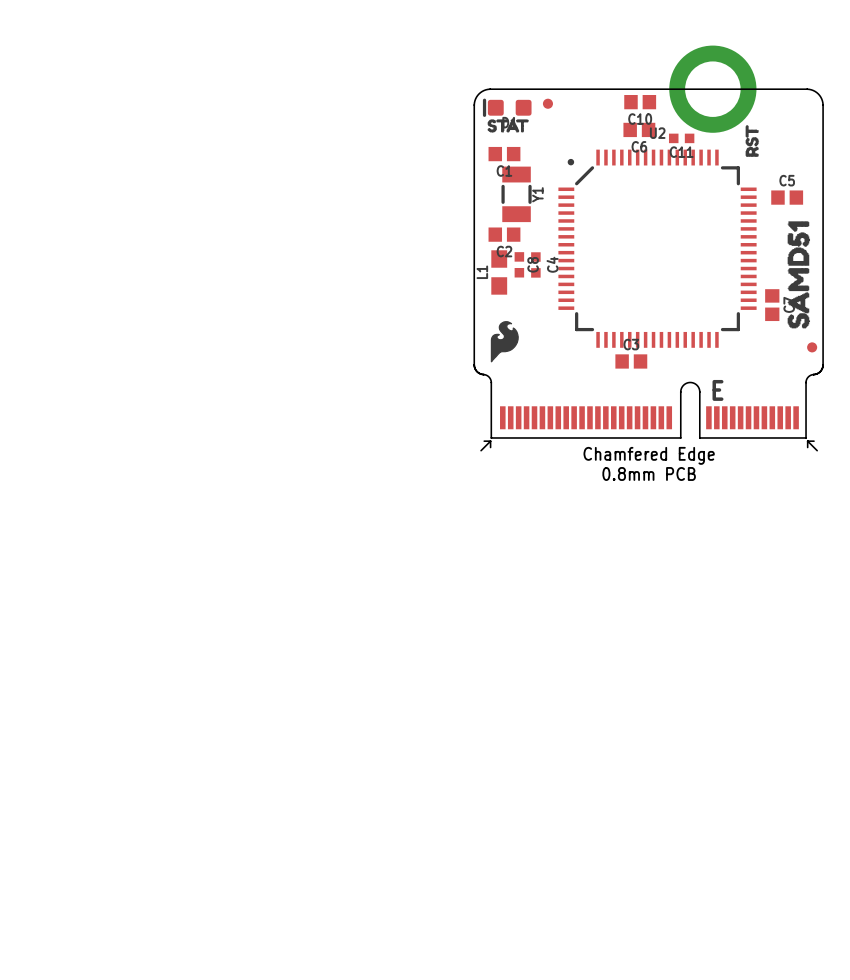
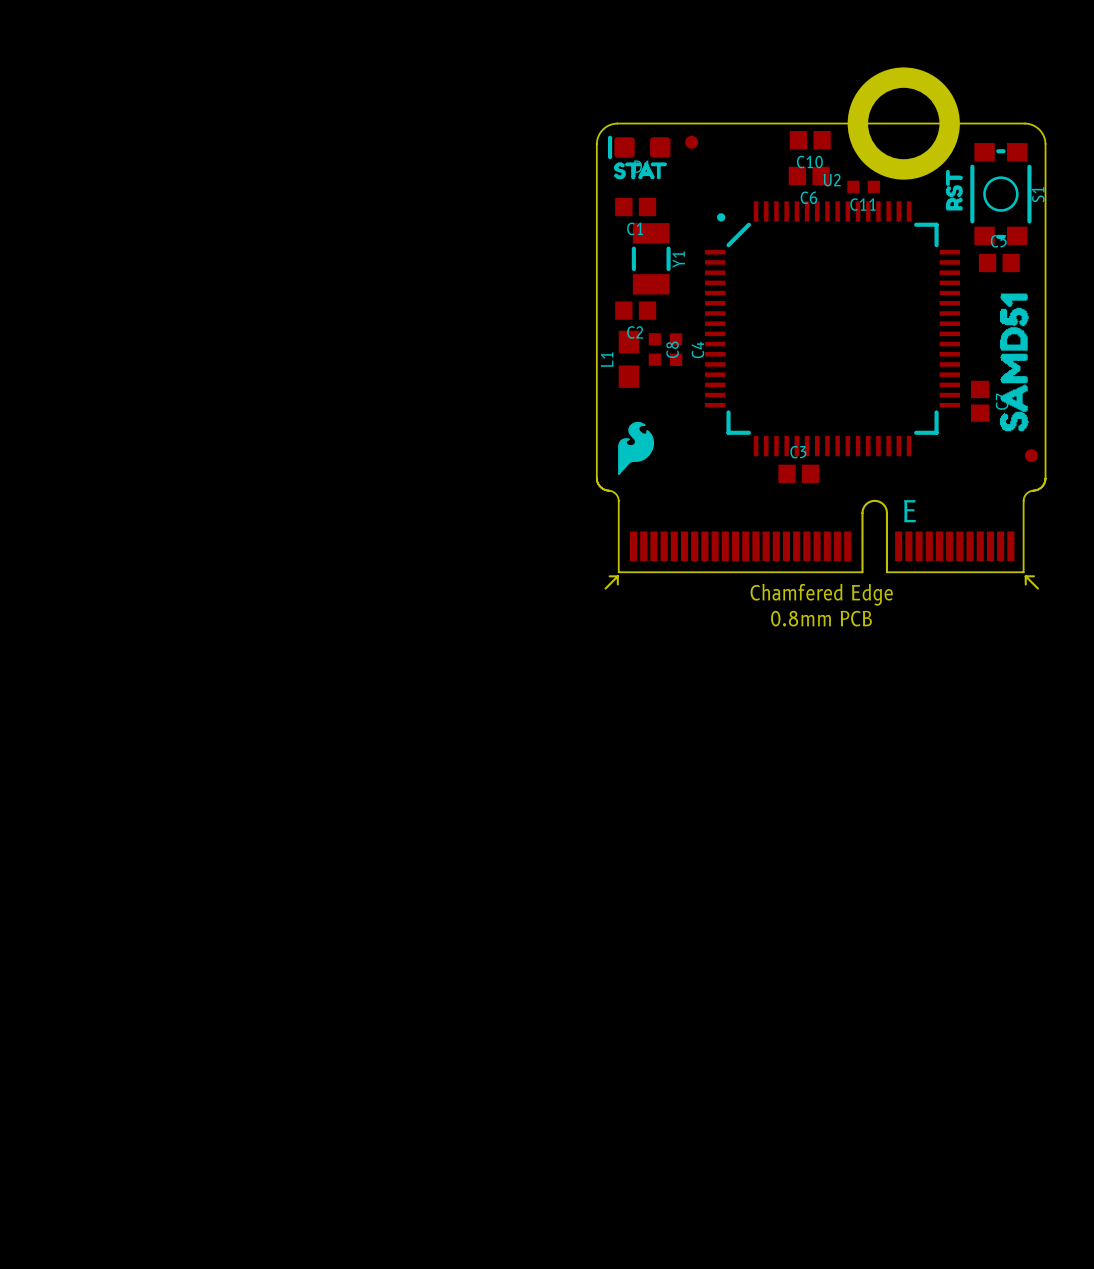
S1: none -> (1000, 194)

